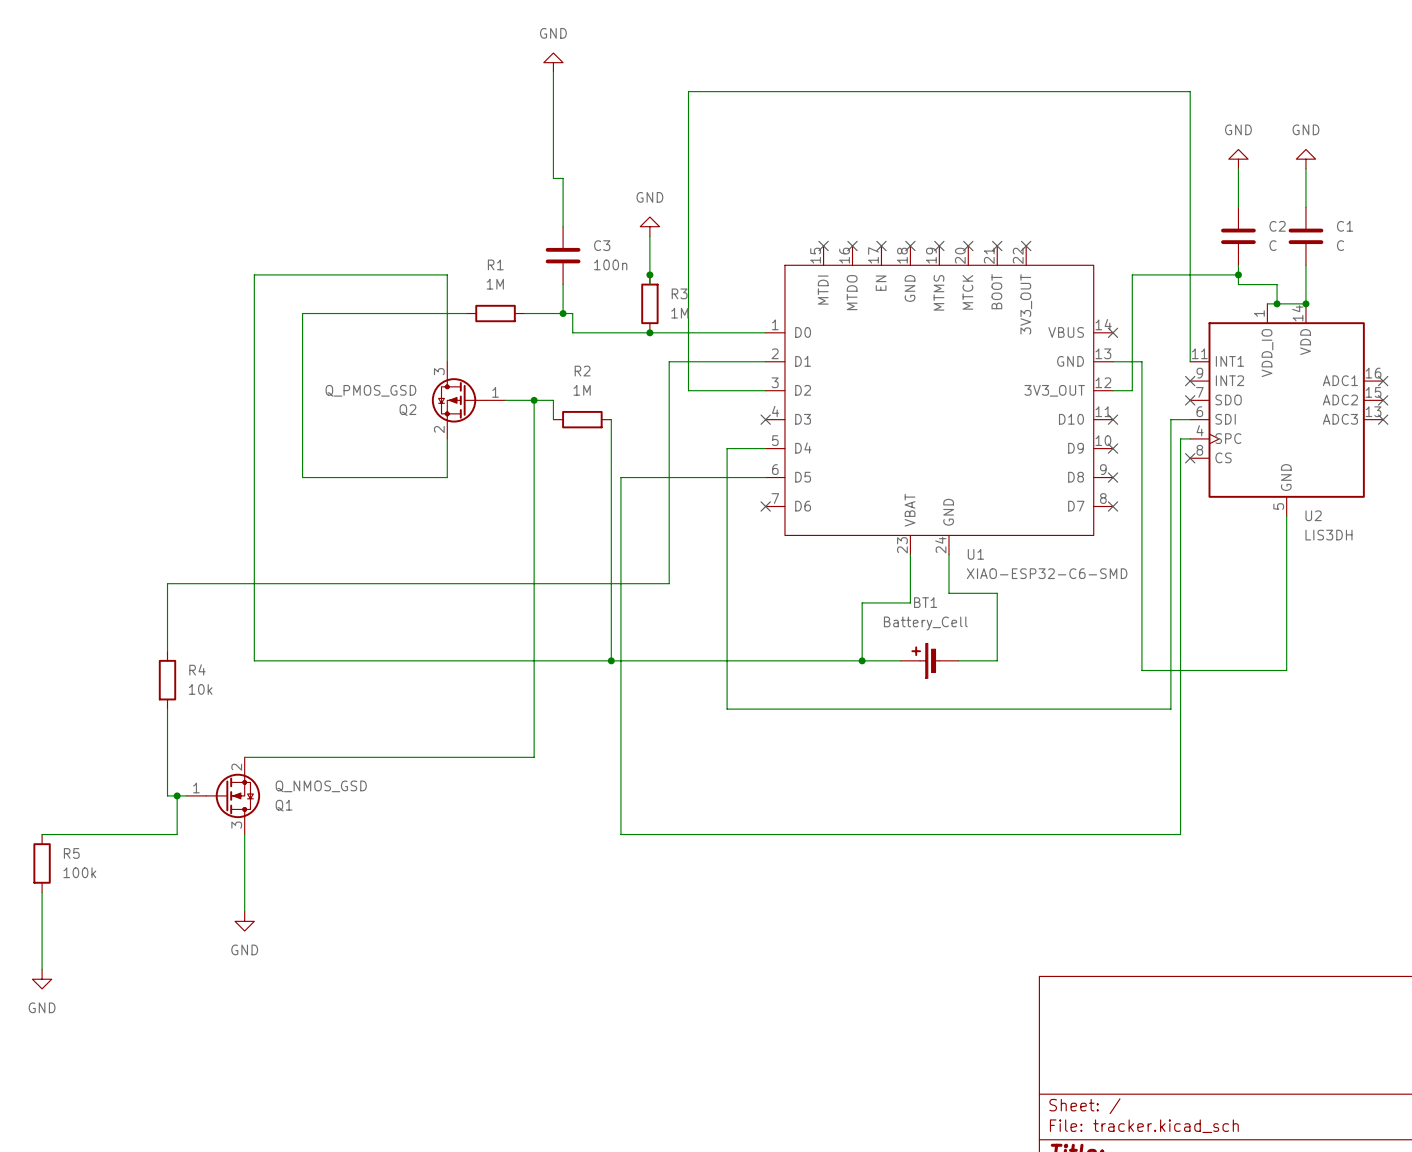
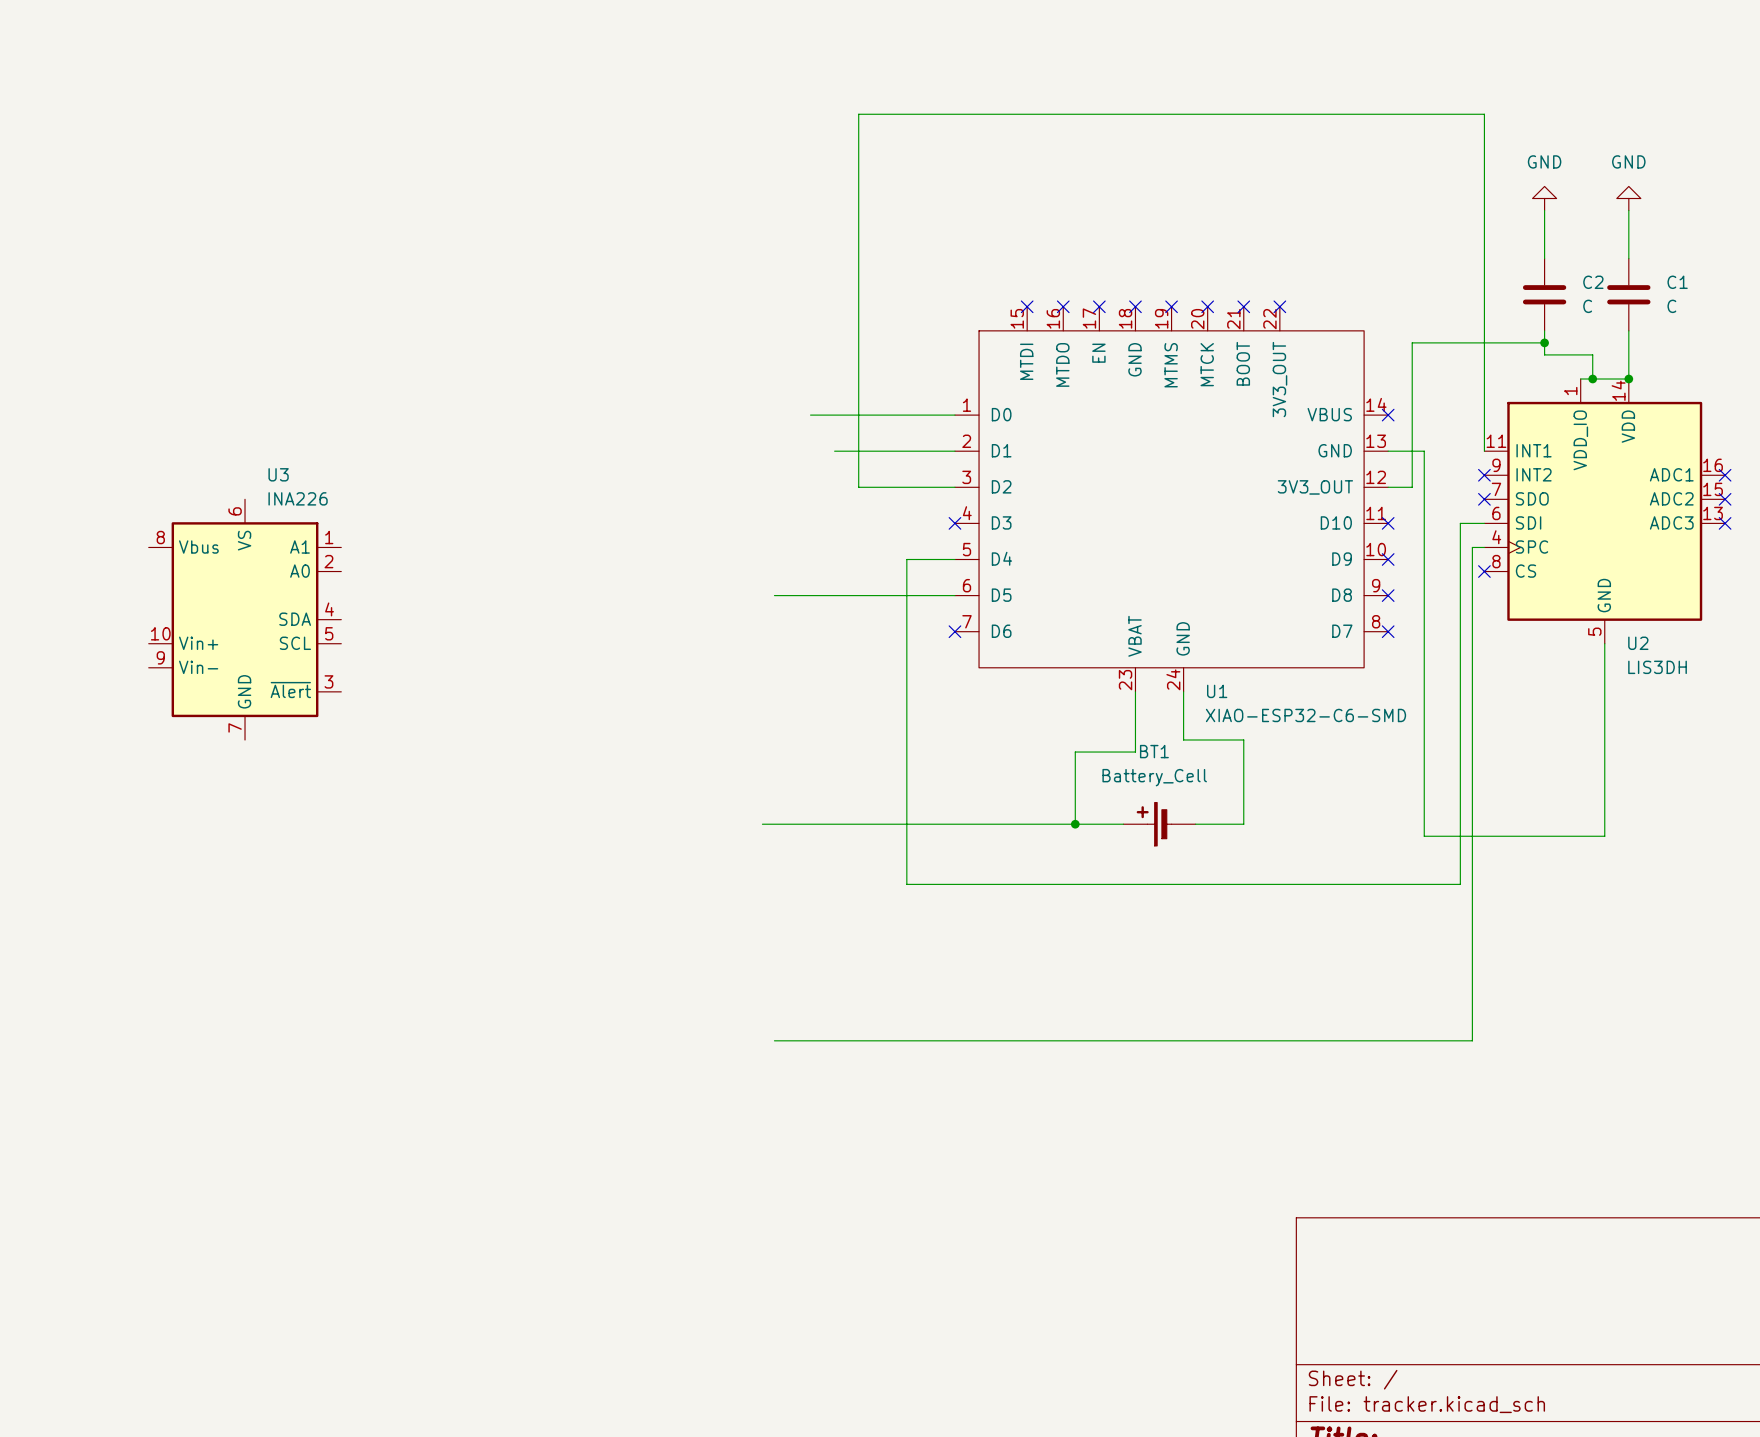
power symbol: GND (553, 62) -> none
wire: (553, 72) (553, 178) (563, 178) (563, 226) -> none
power symbol: GND (649, 226) -> none
wire: (649, 236) (649, 284) -> none
C3: 100n (563, 255) -> none
junction: (649, 274) -> none
wire: (563, 284) (563, 313) -> none
R3: 1M (649, 303) -> none
wire: (466, 313) (302, 313) (302, 477) (447, 477) (447, 438) -> none
R1: 1M (495, 313) -> none
wire: (524, 313) (572, 313) (572, 332) (649, 332) -> none
junction: (563, 313) -> none
junction: (649, 332) -> none
wire: (447, 361) (447, 274) (254, 274) (254, 660) (611, 660) (611, 419) -> none
wire: (669, 361) (669, 583) (167, 583) (167, 651) -> none
Q2: Q_PMOS_GSD (468, 400) -> none
wire: (505, 400) (553, 400) (553, 419) -> none
wire: (534, 400) (534, 757) (244, 757) -> none
junction: (534, 400) -> none
R2: 1M (582, 419) -> none
wire: (620, 477) (620, 834) -> none
U3: none -> INA226 (245, 619)
junction: (611, 660) -> none
R4: 10k (167, 680) -> none
wire: (167, 709) (167, 795) (186, 795) -> none
wire: (177, 795) (177, 834) (42, 834) -> none
junction: (177, 795) -> none
Q1: Q_NMOS_GSD (223, 795) -> none
wire: (244, 834) (244, 911) -> none
R5: 100k (42, 863) -> none
wire: (42, 892) (42, 969) -> none
power symbol: GND (244, 921) -> none
power symbol: GND (42, 979) -> none

